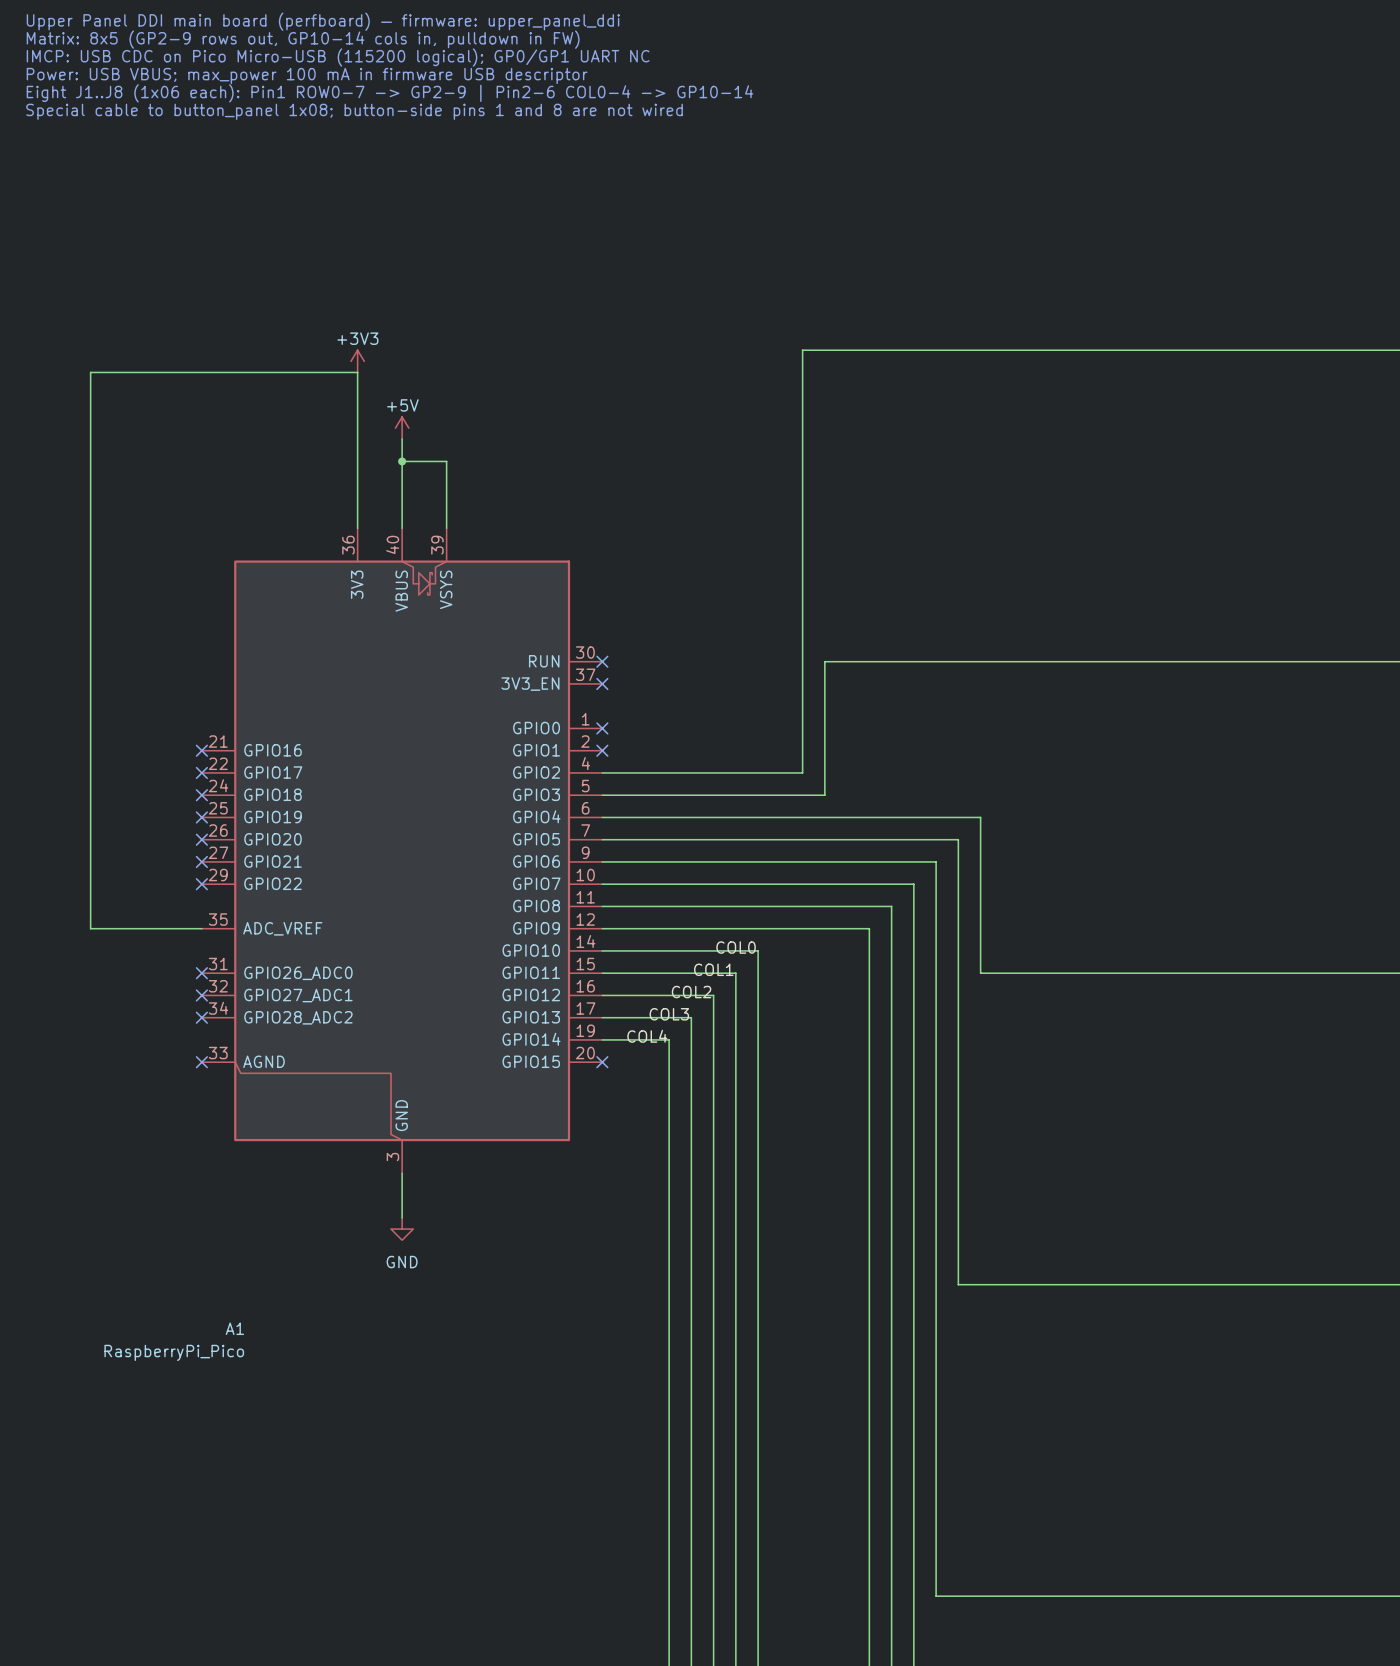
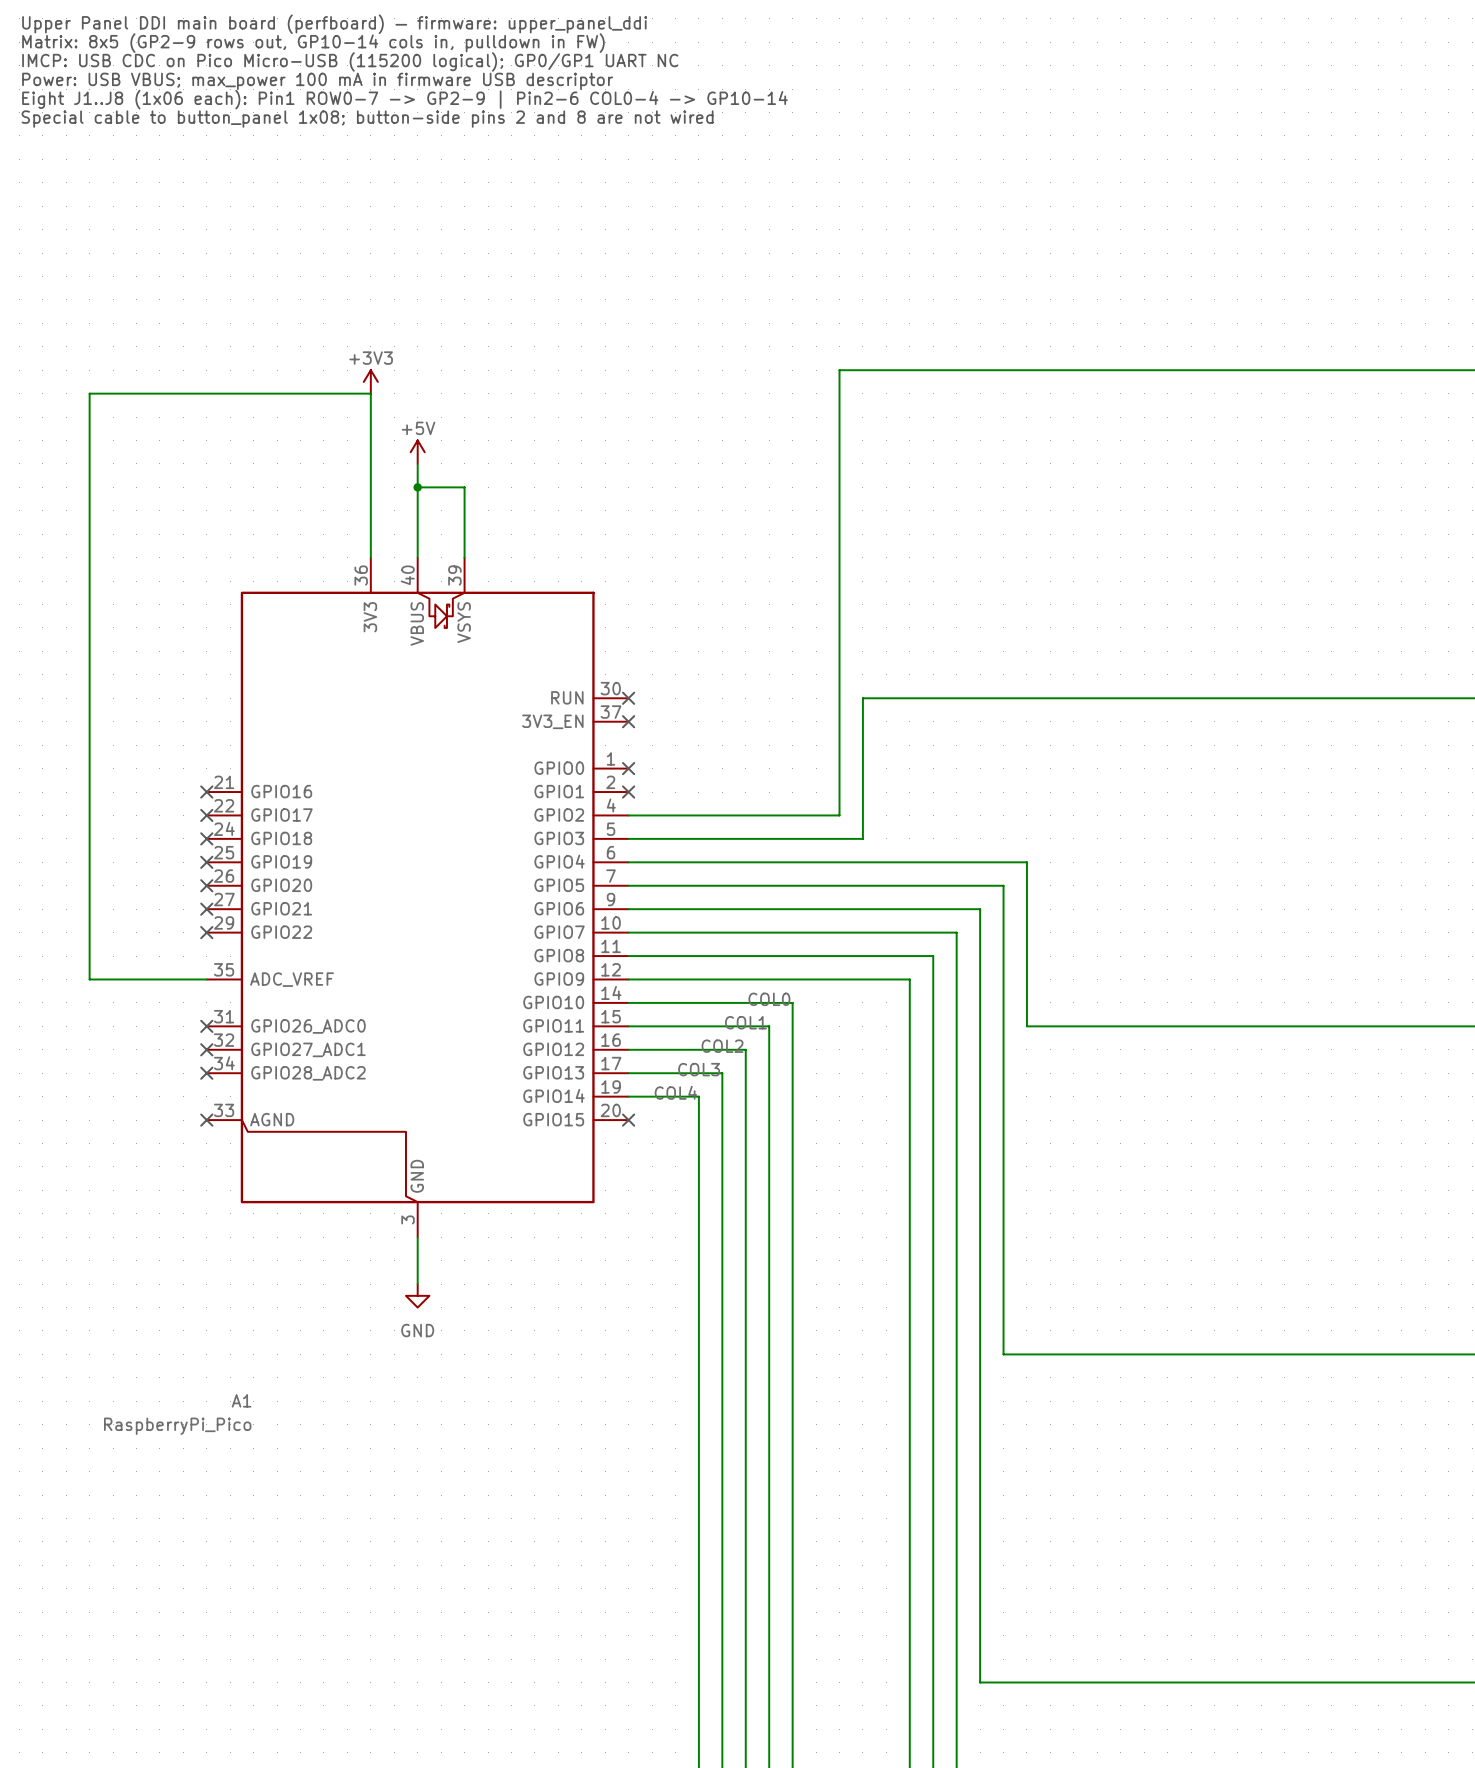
text: Special cable to button_panel 1x08; button-side pins 1 and 8 are not wired (354, 111) -> Special cable to button_panel 1x08; button-side pins 2 and 8 are not wired (367, 119)

